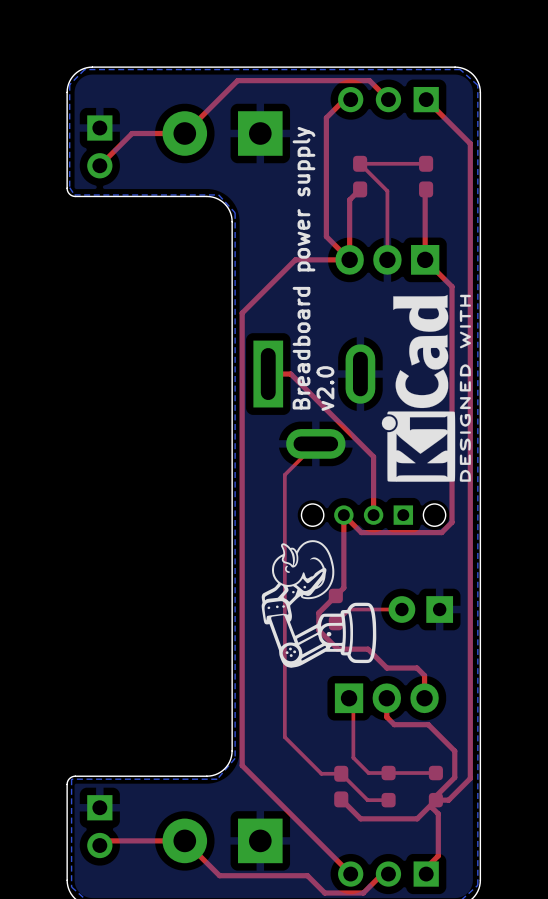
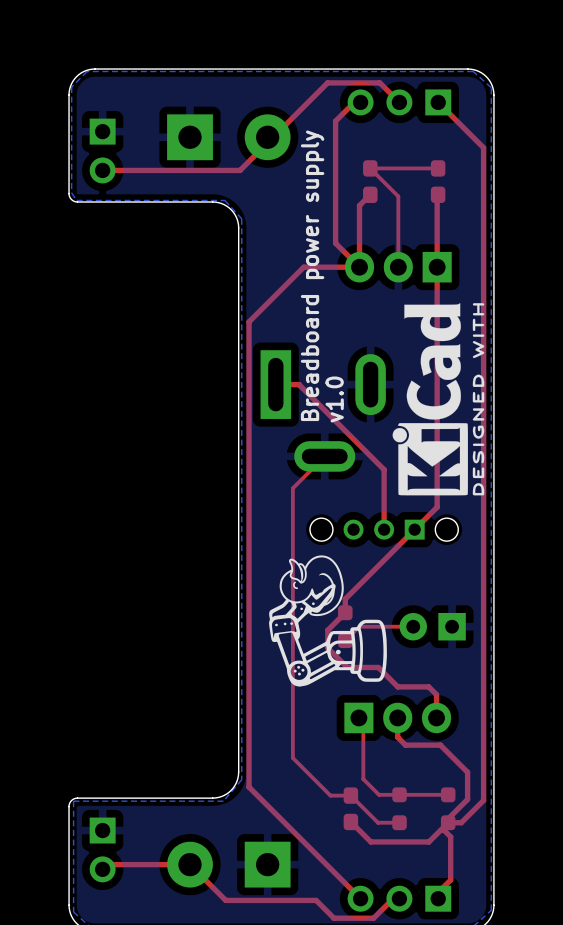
top track: (318, 80) (237, 80) (184, 133) (132, 133) (99, 165) -> (327, 82) (240, 170) (102, 170)
part rotation: 0° (222, 133) -> 180° (228, 137)
top track: (425, 259) (452, 286) (452, 522) (441, 532) (361, 532) (343, 515) (343, 587) (335, 595) -> (437, 267) (437, 507) (345, 599) (345, 612)
text: v2.0 (325, 388) -> v1.0 (334, 399)

